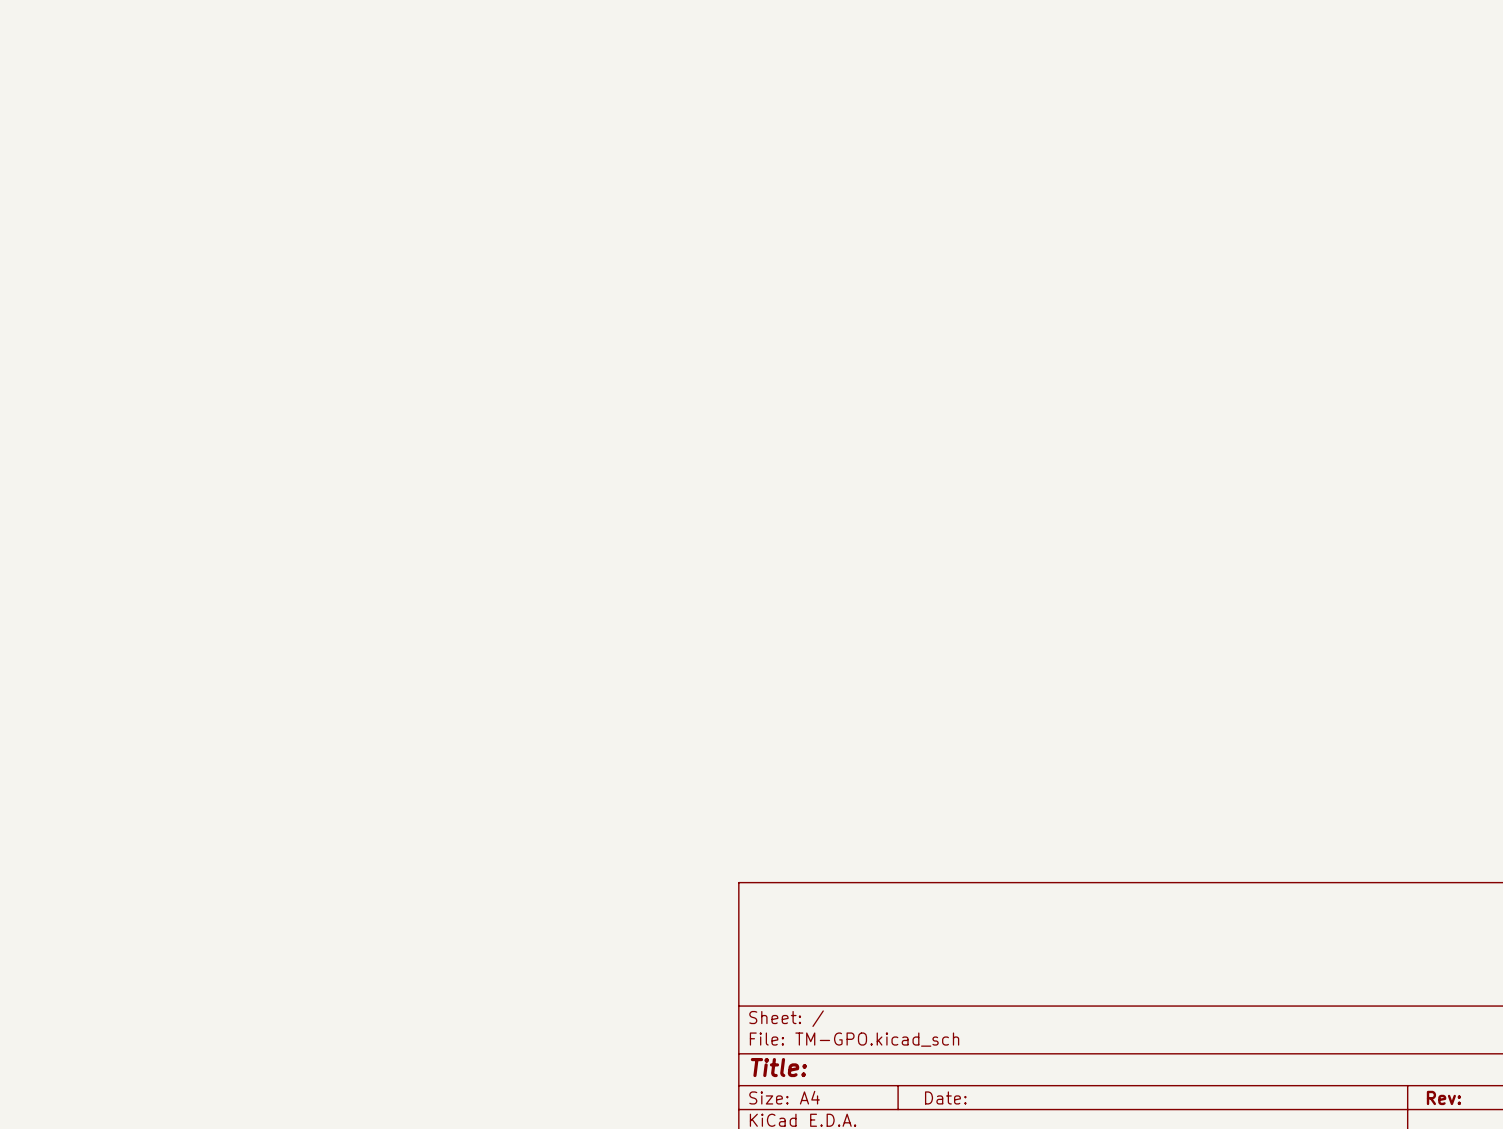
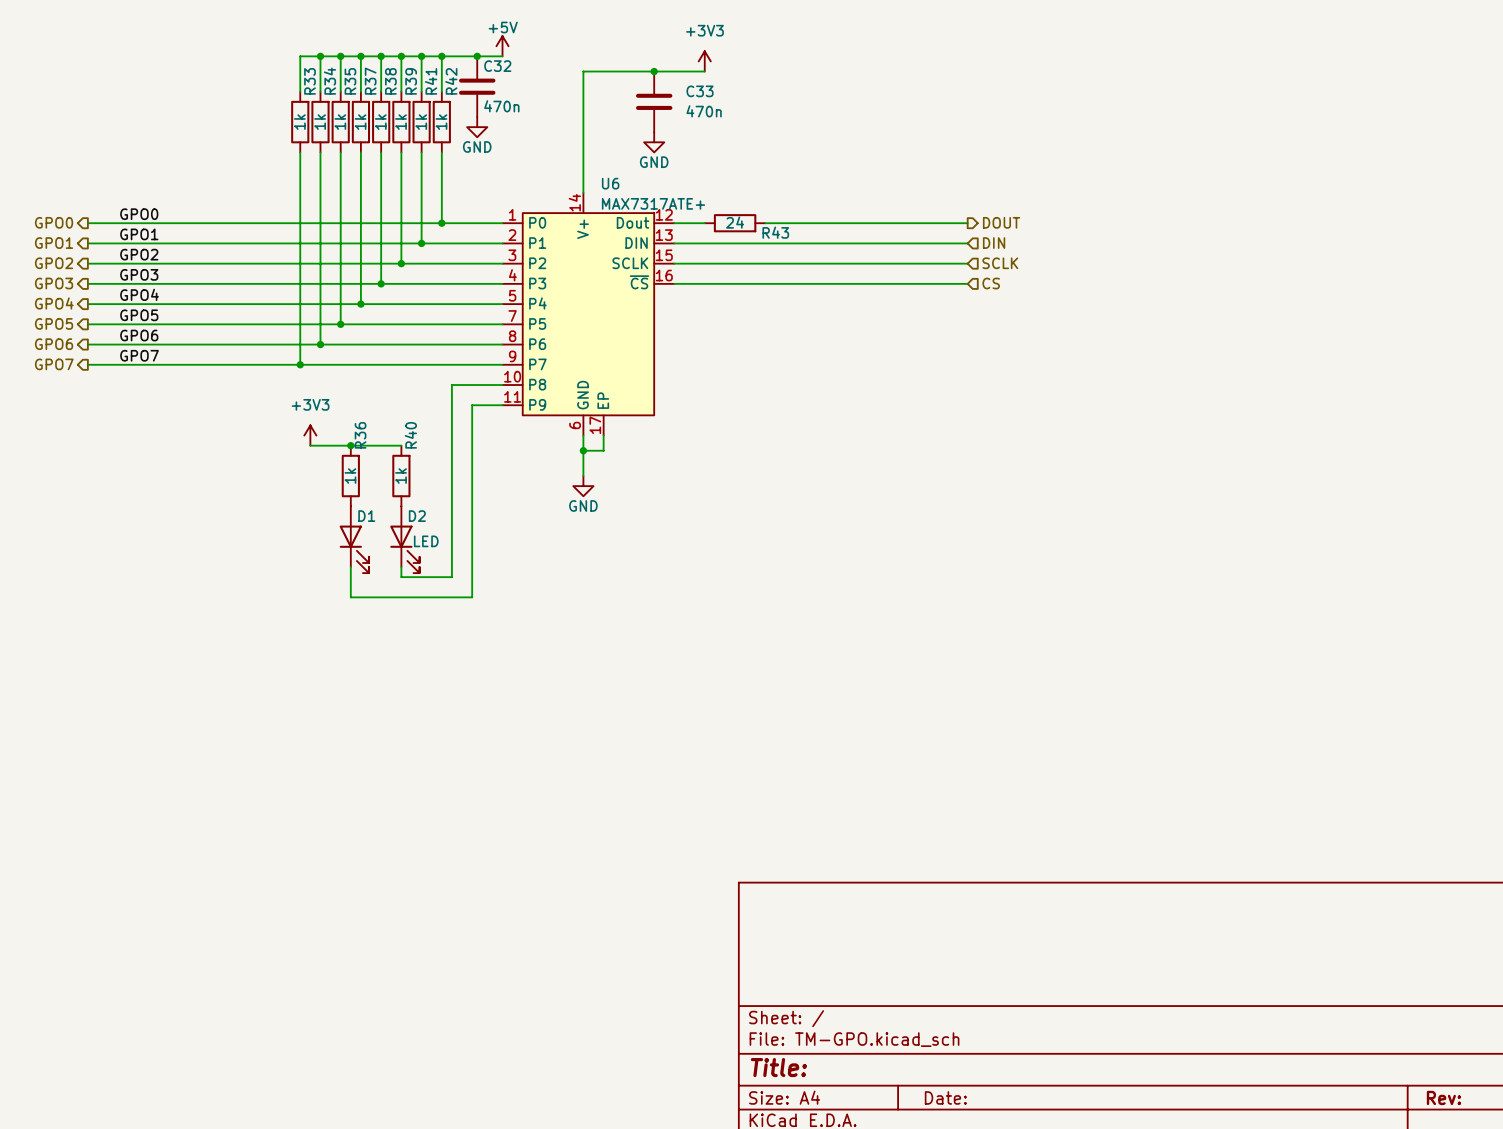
power symbol: none -> +5V (502, 46)
wire: none -> (320, 56) (320, 91)
junction: none -> (320, 56)
wire: none -> (340, 56) (340, 91)
junction: none -> (340, 56)
wire: none -> (360, 56) (360, 91)
junction: none -> (360, 56)
wire: none -> (381, 56) (381, 91)
junction: none -> (381, 56)
wire: none -> (401, 56) (401, 91)
junction: none -> (401, 56)
wire: none -> (421, 56) (421, 91)
junction: none -> (421, 56)
wire: none -> (441, 56) (441, 91)
junction: none -> (441, 56)
junction: none -> (477, 56)
wire: none -> (502, 56) (300, 56) (300, 91)
power symbol: none -> +3V3 (704, 61)
junction: none -> (654, 71)
wire: none -> (704, 71) (583, 71) (583, 192)
C32: none -> 470n (477, 86)
C33: none -> 470n (654, 101)
R33: none -> 1k (300, 122)
R34: none -> 1k (320, 122)
R35: none -> 1k (340, 122)
R37: none -> 1k (360, 122)
R38: none -> 1k (381, 122)
R39: none -> 1k (401, 122)
R41: none -> 1k (421, 122)
R42: none -> 1k (441, 122)
power symbol: none -> GND (477, 127)
power symbol: none -> GND (654, 142)
wire: none -> (300, 152) (300, 364)
wire: none -> (320, 152) (320, 344)
wire: none -> (340, 152) (340, 324)
wire: none -> (360, 152) (360, 304)
wire: none -> (381, 152) (381, 283)
wire: none -> (401, 152) (401, 263)
wire: none -> (421, 152) (421, 243)
wire: none -> (441, 152) (441, 223)
label: none -> GPO0 (139, 214)
hierarchical label: none -> GPO0 (54, 222)
hierarchical label: none -> DOUT (1001, 222)
wire: none -> (87, 223) (502, 223)
junction: none -> (441, 223)
wire: none -> (674, 223) (704, 223)
R43: none -> 24 (735, 223)
wire: none -> (765, 223) (967, 223)
label: none -> GPO1 (139, 234)
hierarchical label: none -> GPO1 (54, 243)
wire: none -> (87, 243) (502, 243)
junction: none -> (421, 243)
wire: none -> (674, 243) (967, 243)
hierarchical label: none -> DIN (994, 243)
label: none -> GPO2 (139, 254)
hierarchical label: none -> GPO2 (54, 263)
wire: none -> (87, 263) (502, 263)
junction: none -> (401, 263)
wire: none -> (674, 263) (967, 263)
hierarchical label: none -> SCLK (1000, 263)
label: none -> GPO3 (139, 274)
hierarchical label: none -> GPO3 (54, 283)
wire: none -> (87, 283) (502, 283)
junction: none -> (381, 283)
wire: none -> (674, 283) (967, 283)
hierarchical label: none -> CS (991, 283)
label: none -> GPO4 (139, 294)
hierarchical label: none -> GPO4 (54, 303)
wire: none -> (87, 304) (502, 304)
junction: none -> (360, 304)
U6: none -> MAX7317ATE+ (588, 314)
label: none -> GPO5 (139, 315)
hierarchical label: none -> GPO5 (54, 323)
wire: none -> (87, 324) (502, 324)
junction: none -> (340, 324)
label: none -> GPO6 (139, 335)
hierarchical label: none -> GPO6 (54, 344)
wire: none -> (87, 344) (502, 344)
junction: none -> (320, 344)
label: none -> GPO7 (139, 355)
hierarchical label: none -> GPO7 (54, 364)
wire: none -> (87, 364) (502, 364)
junction: none -> (300, 364)
wire: none -> (502, 385) (451, 385) (451, 577) (401, 577) (401, 567)
wire: none -> (502, 405) (472, 405) (472, 597) (350, 597) (350, 567)
power symbol: none -> +3V3 (310, 435)
wire: none -> (583, 435) (583, 476)
wire: none -> (603, 435) (603, 450) (583, 450)
wire: none -> (310, 445) (401, 445)
junction: none -> (350, 445)
junction: none -> (583, 450)
R36: none -> 1k (350, 476)
R40: none -> 1k (401, 476)
power symbol: none -> GND (583, 486)
D1: none -> (354, 539)
D2: none -> LED (404, 539)

